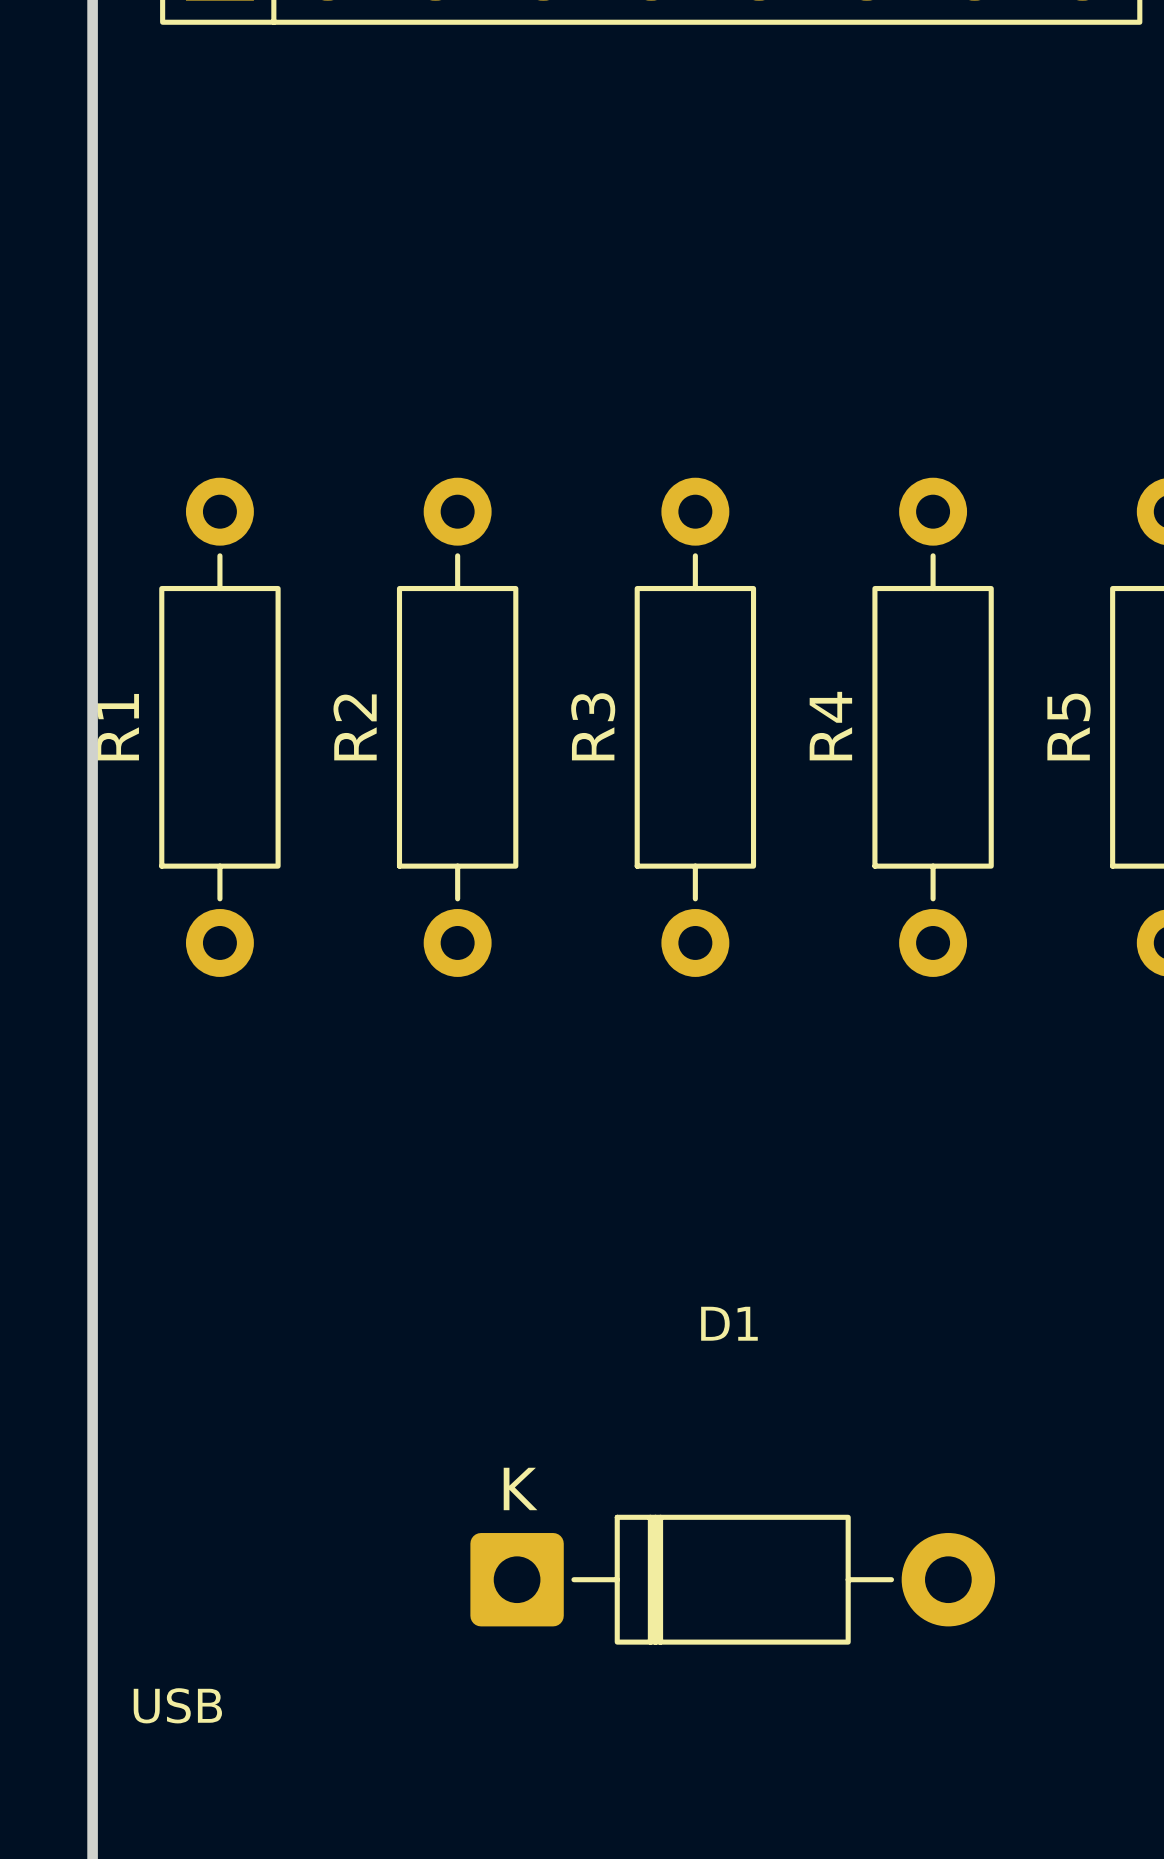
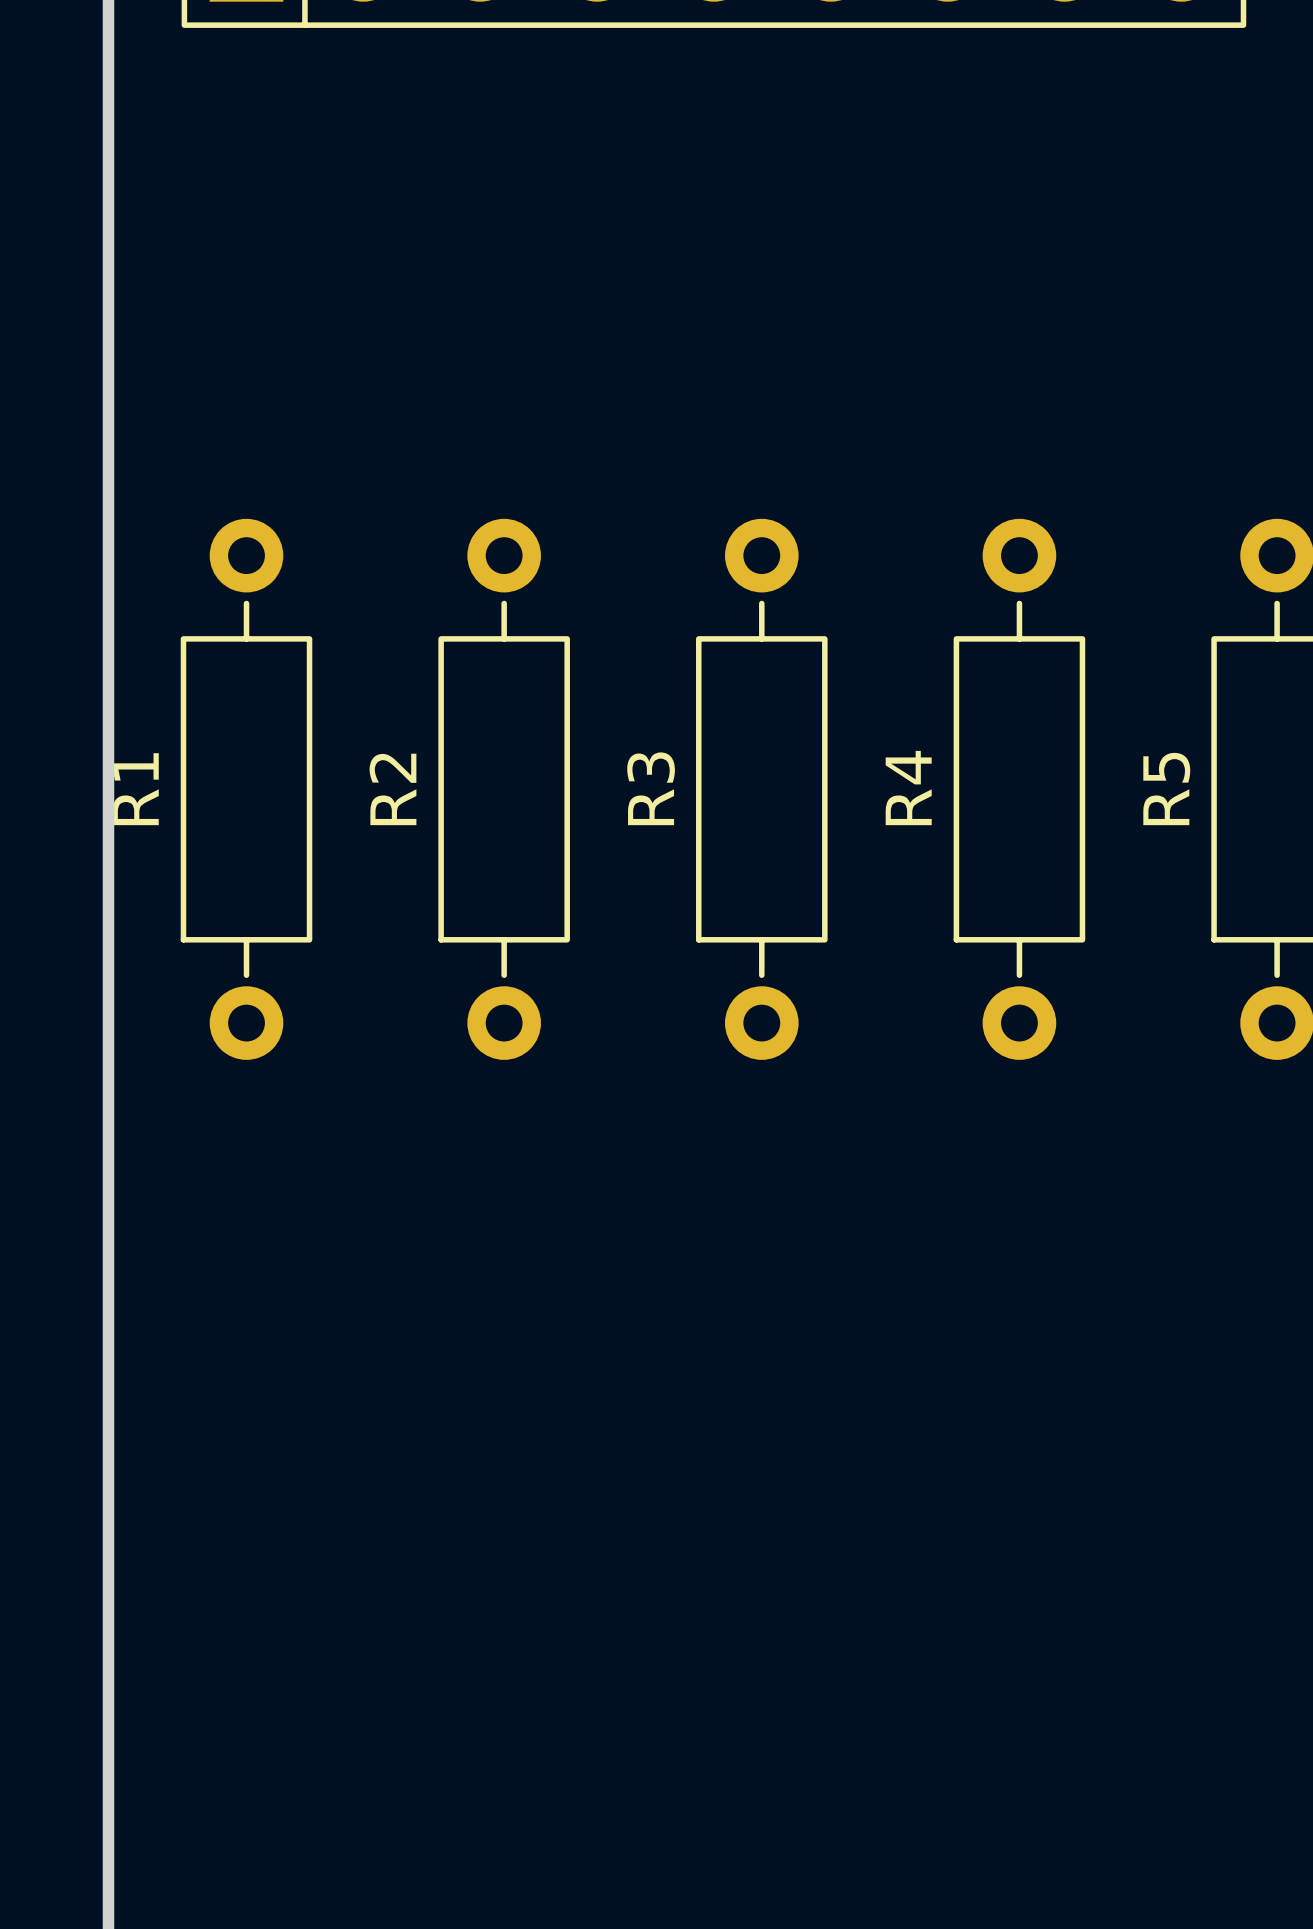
text: D1 (729, 1323) -> none
part: (732, 1579) -> none
text: USB (177, 1705) -> none

